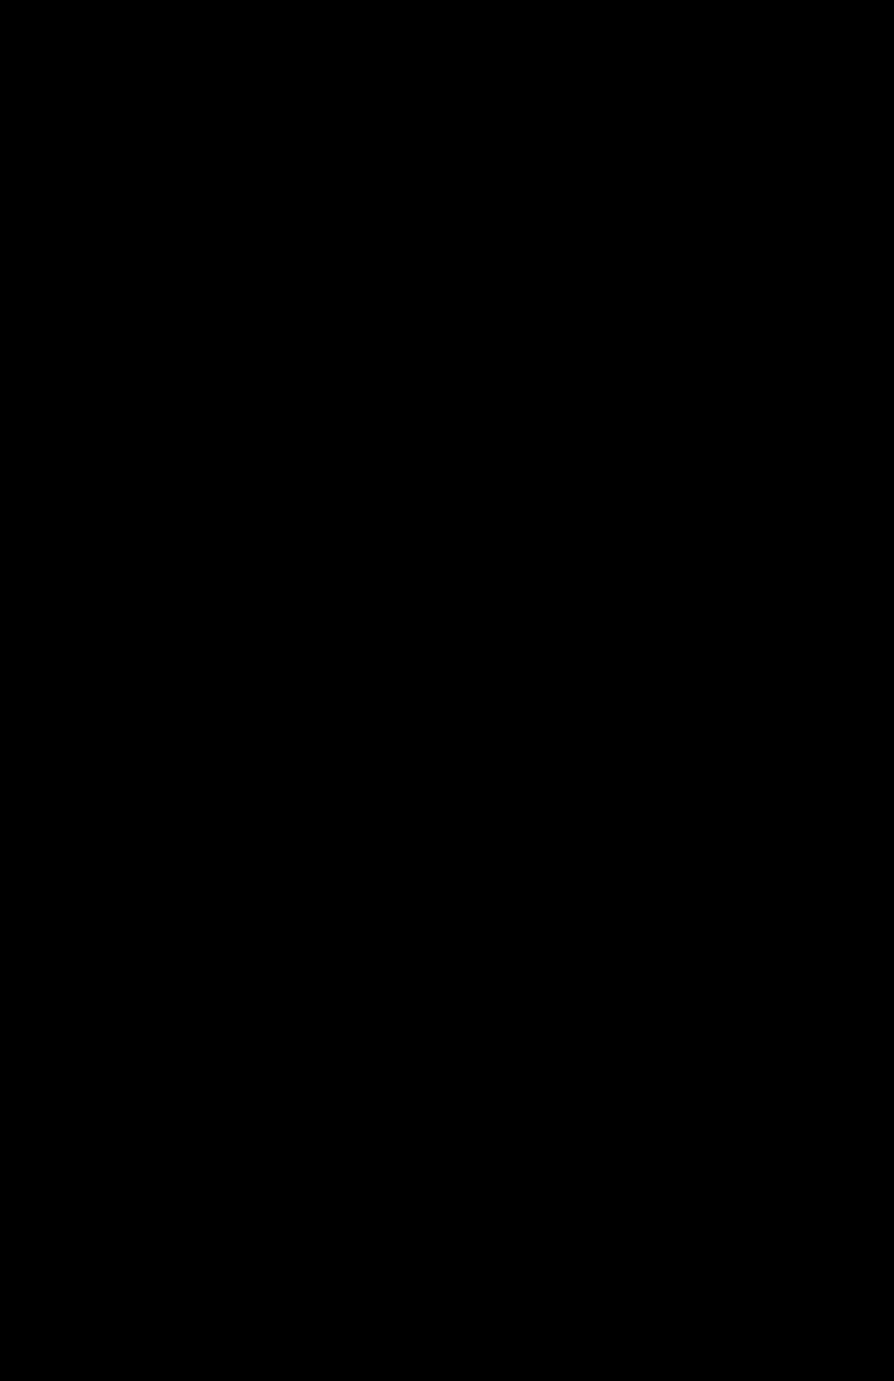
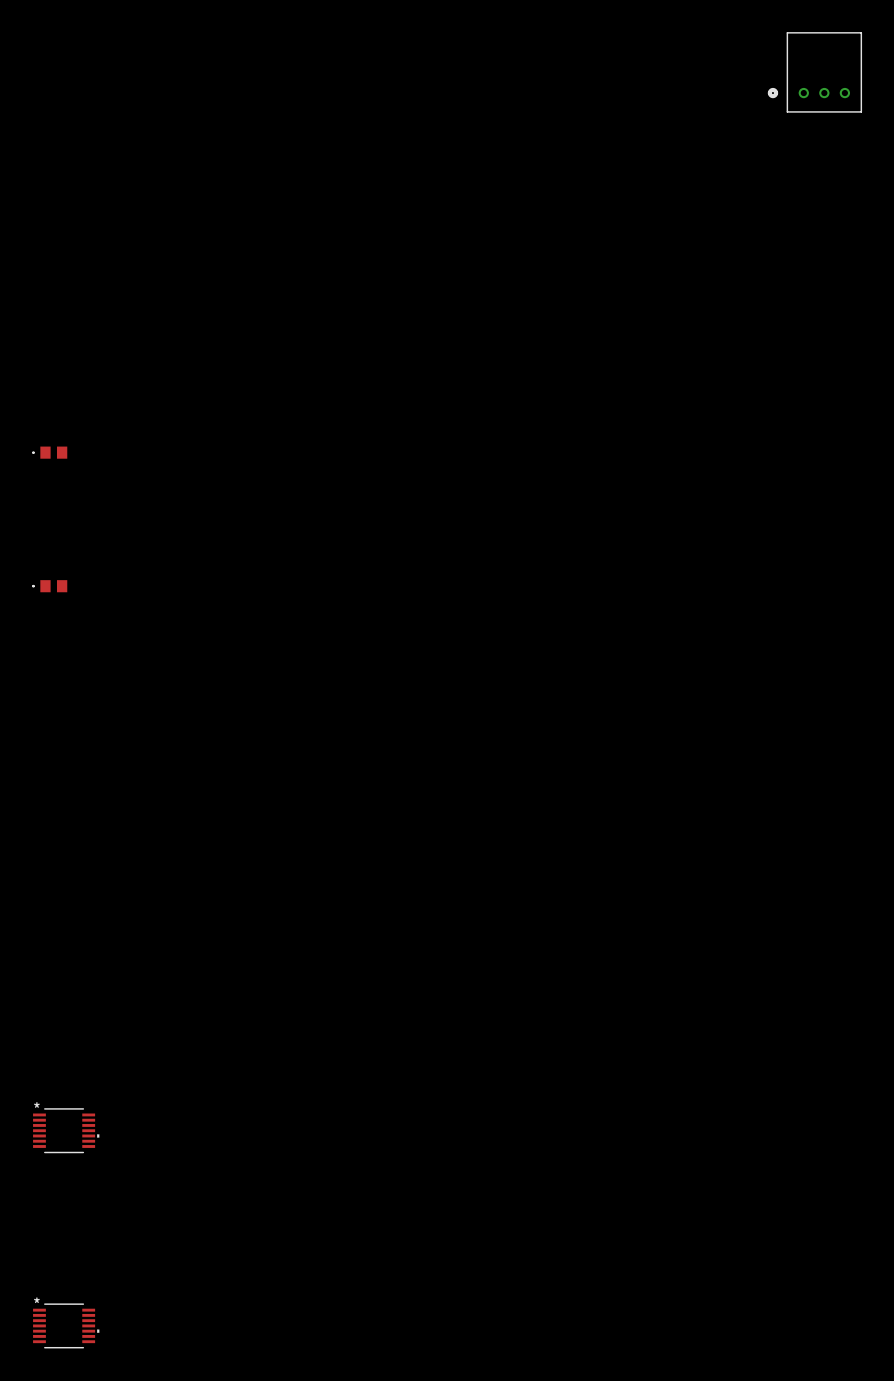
part: none -> (814, 72)
part: none -> (49, 452)
part: none -> (49, 586)
part: none -> (66, 1130)
part: none -> (66, 1325)

